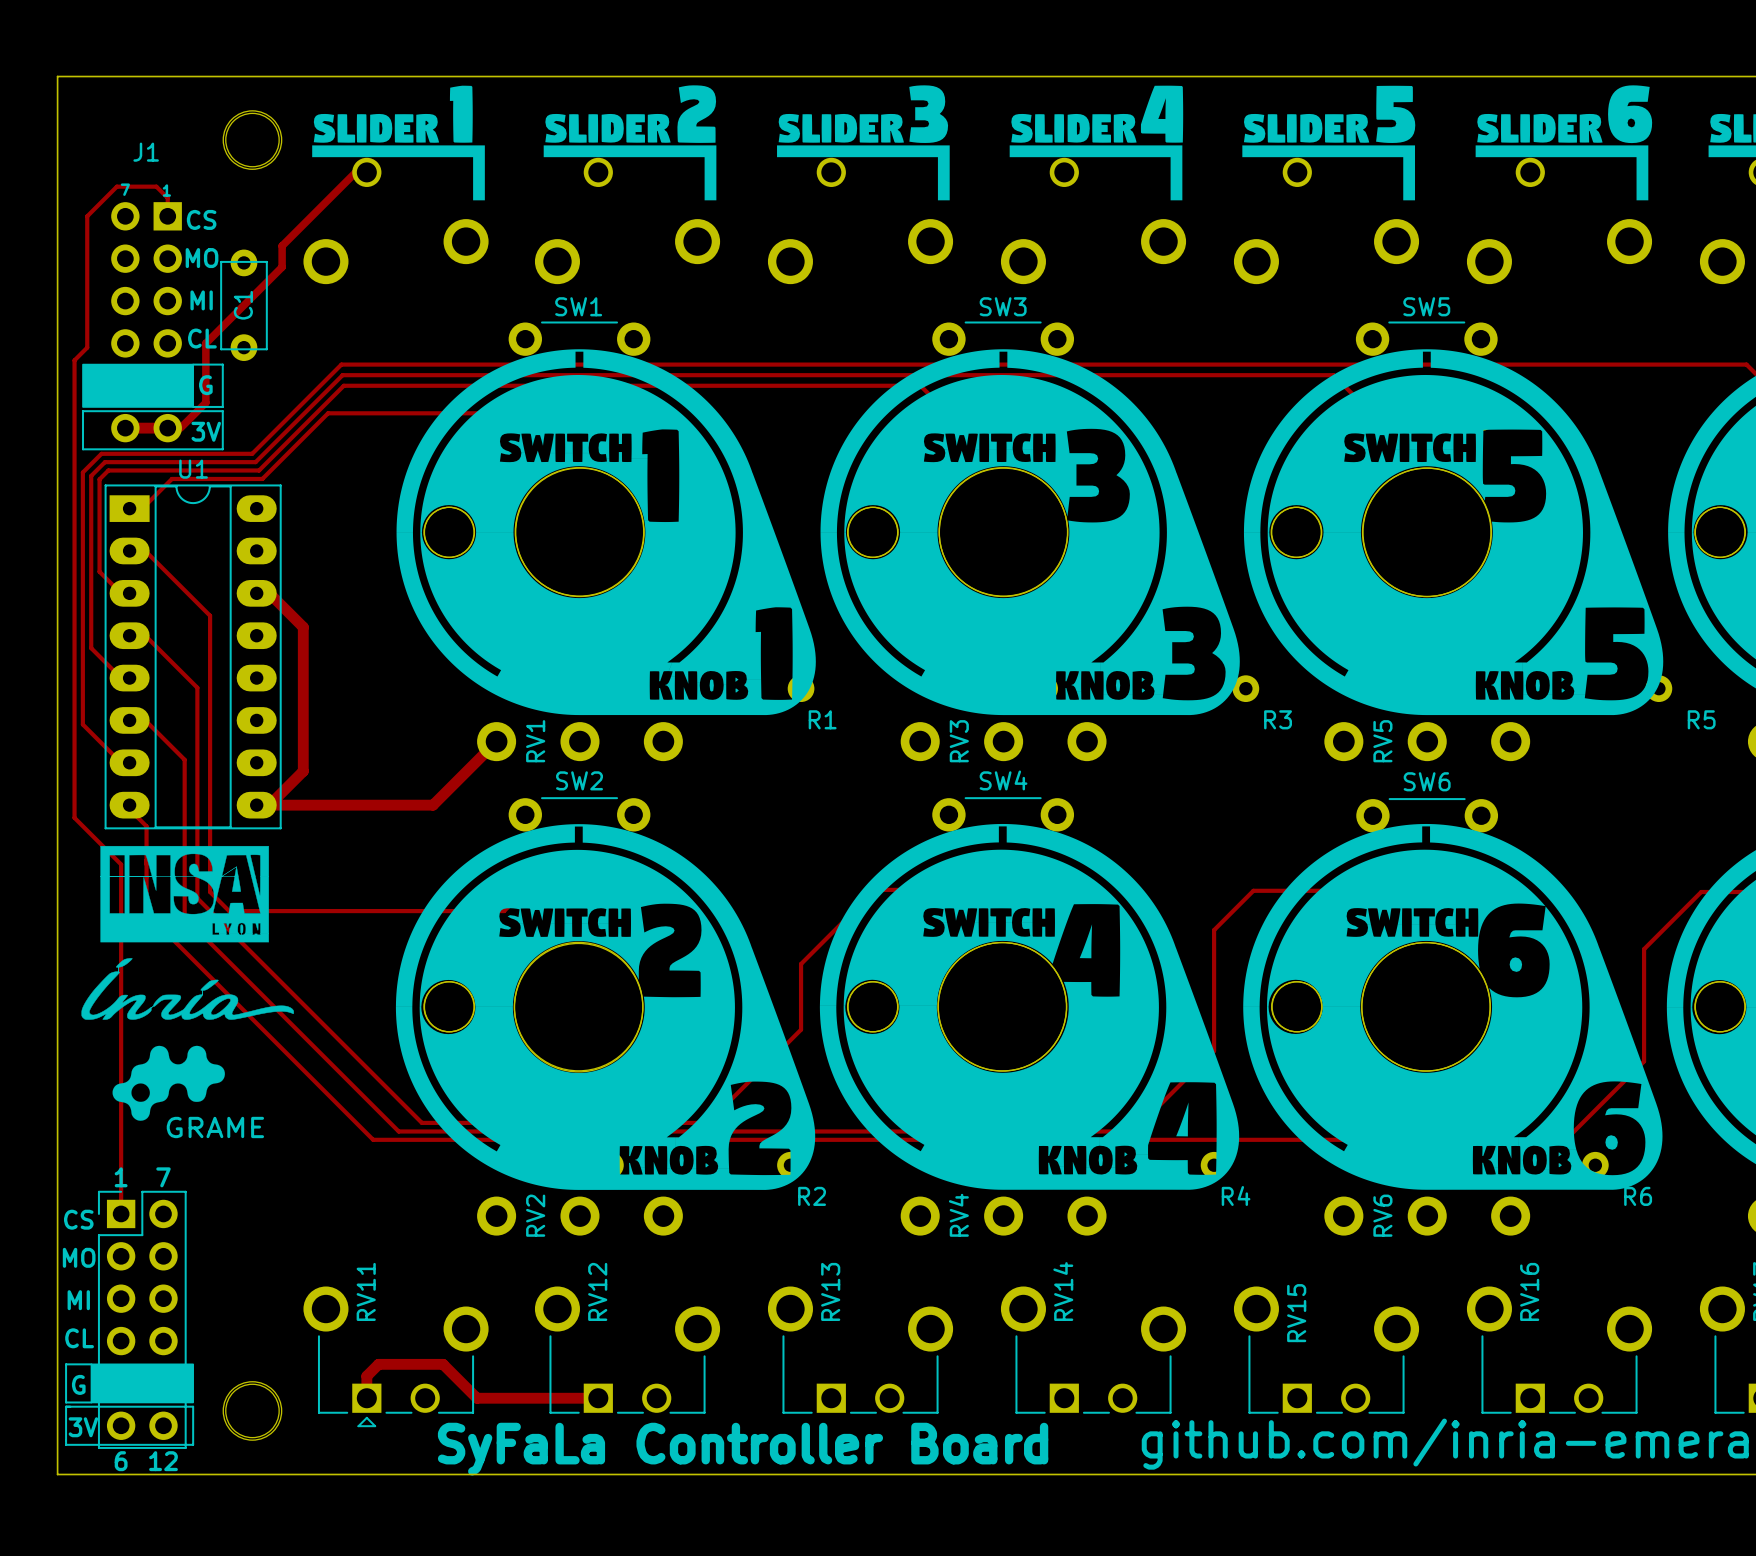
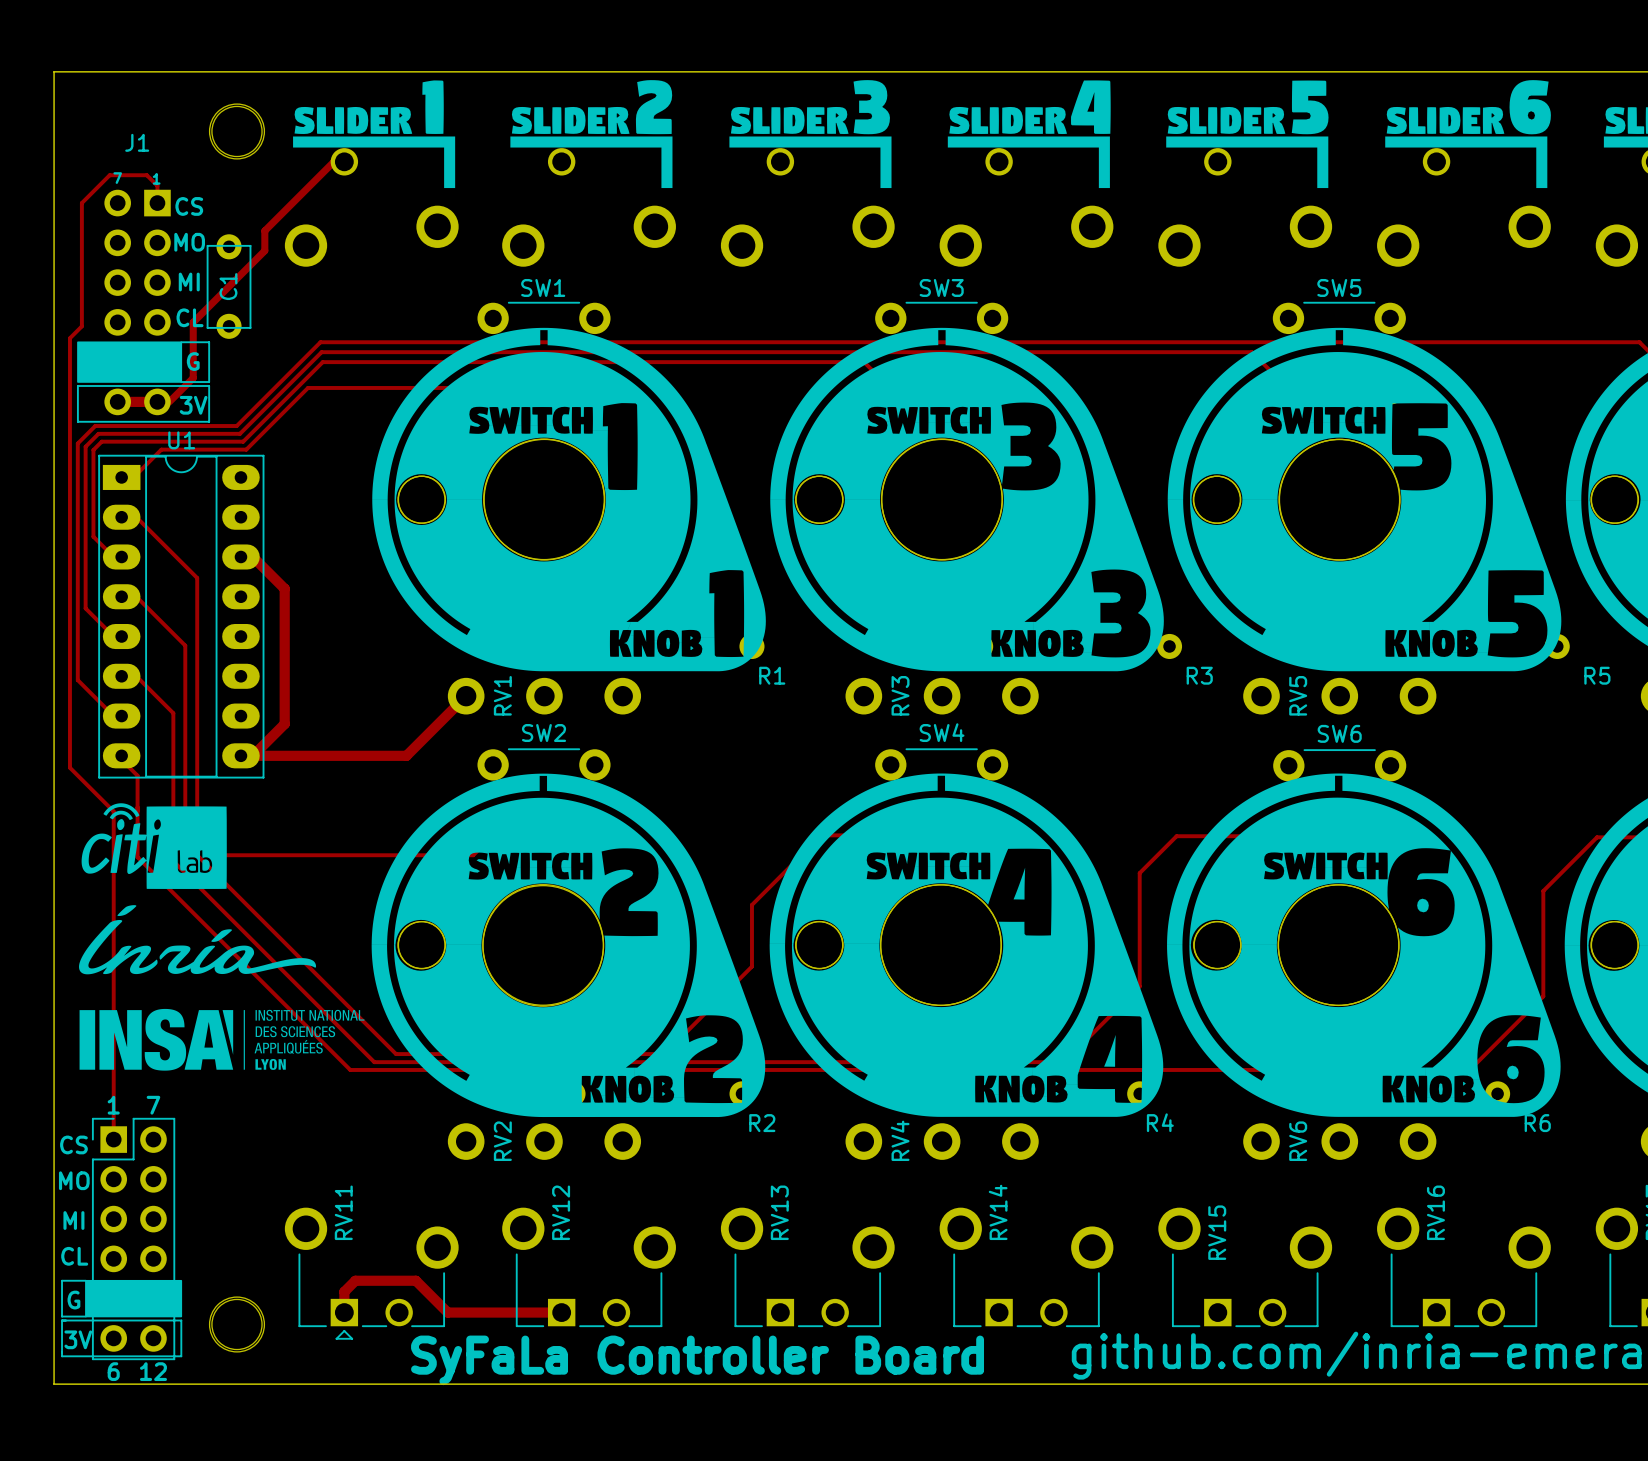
drawing shape: [100, 845, 269, 943] -> [124, 806, 227, 889]
drawing: none -> [81, 803, 140, 874]
drawing: none -> [188, 859, 210, 871]
drawing: [81, 958, 294, 1020] -> none
drawing: none -> [79, 905, 317, 975]
drawing: [112, 1045, 225, 1121] -> none
drawing: none -> [79, 1008, 365, 1071]
text: GRAME (215, 1127) -> none

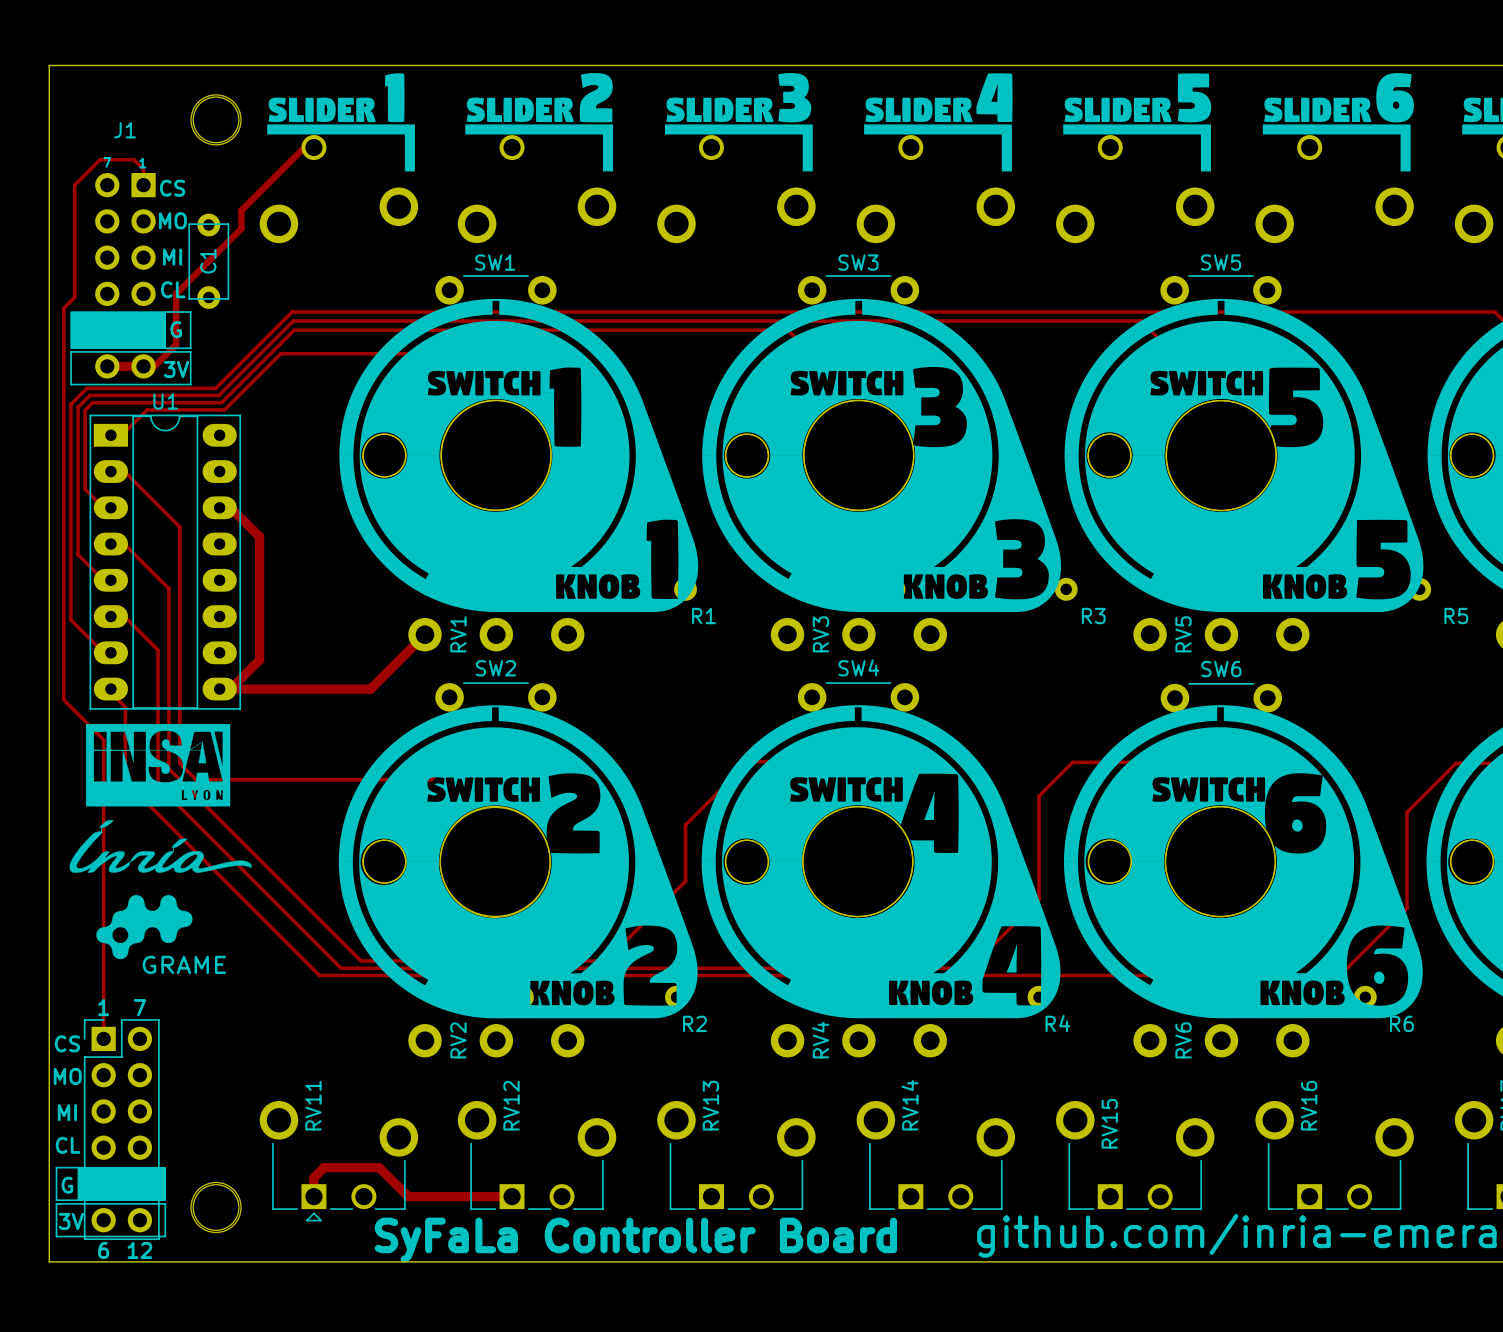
drawing: [81, 803, 140, 874] -> none
drawing shape: [124, 806, 227, 889] -> [85, 723, 231, 807]
drawing: [188, 859, 210, 871] -> none
drawing: none -> [69, 819, 252, 873]
drawing: [79, 905, 317, 975] -> none
drawing: none -> [96, 895, 193, 960]
drawing: [79, 1008, 365, 1071] -> none
text: none -> GRAME (184, 964)

